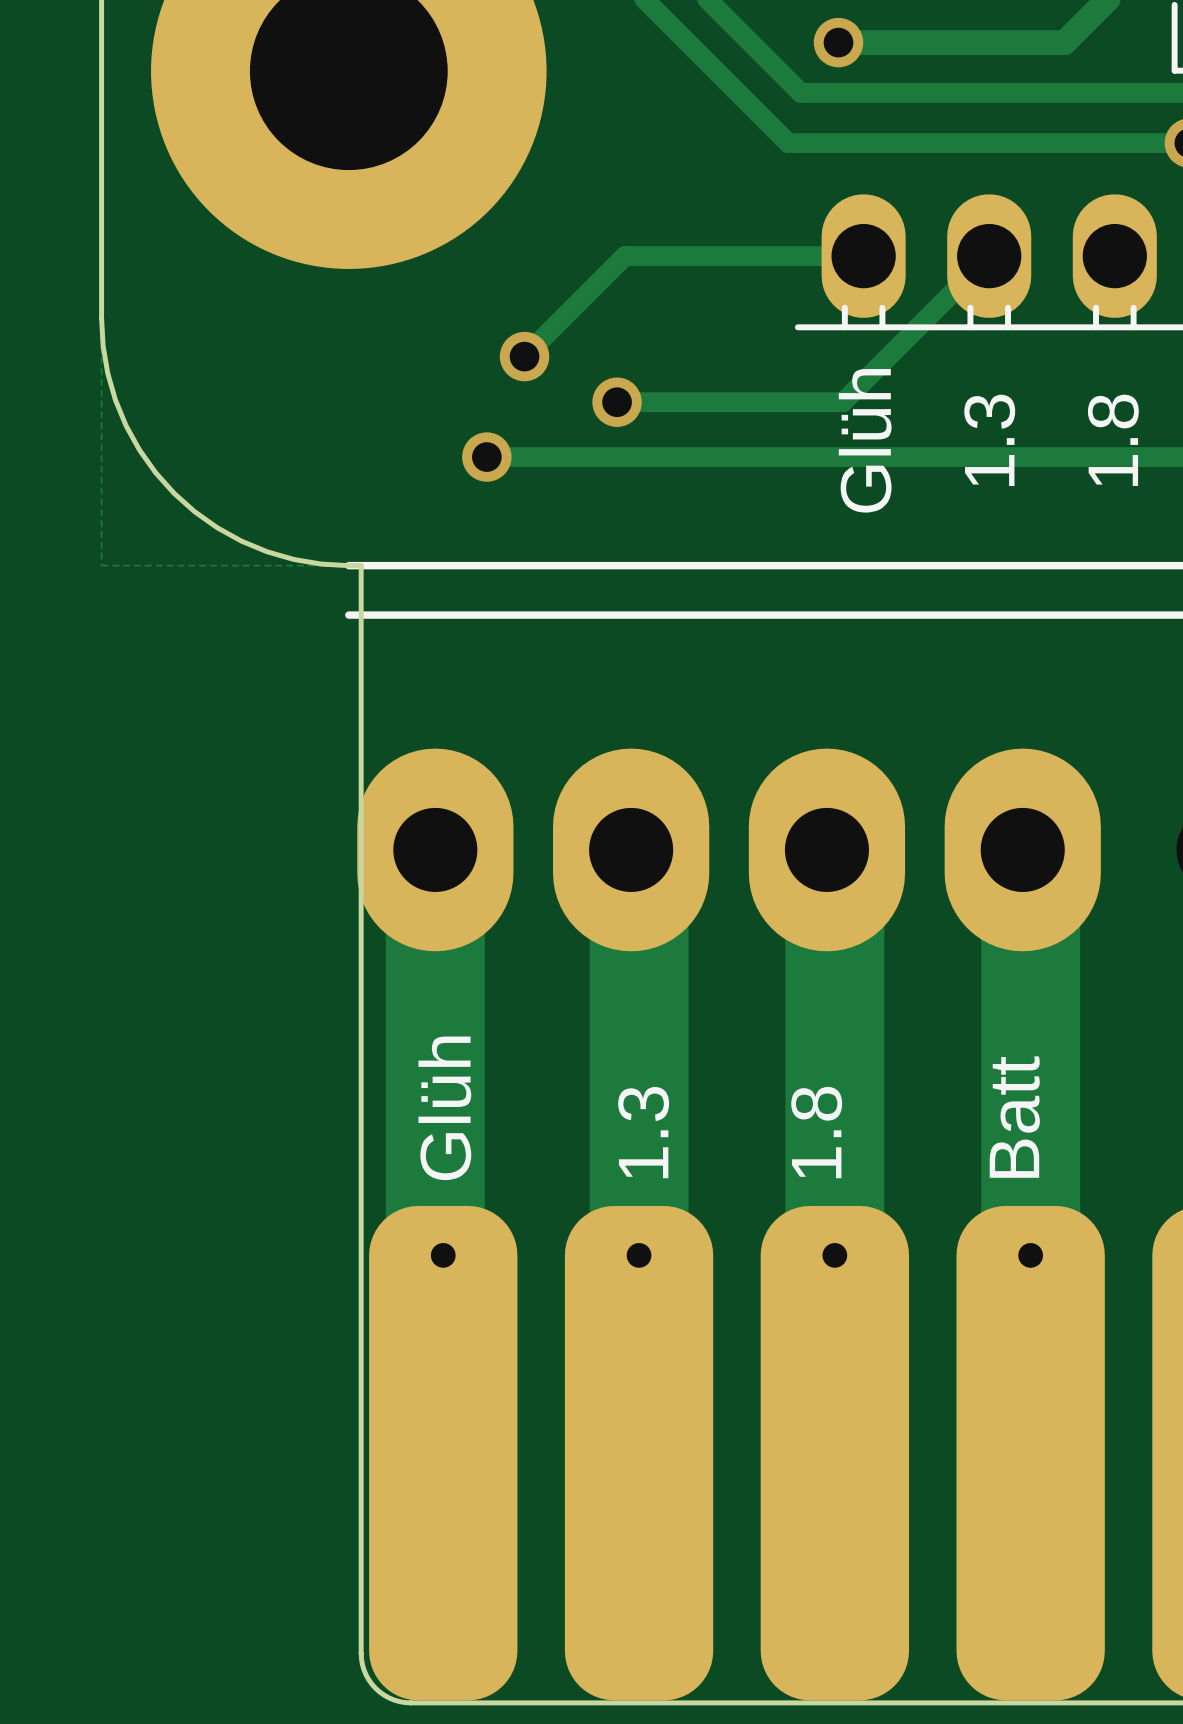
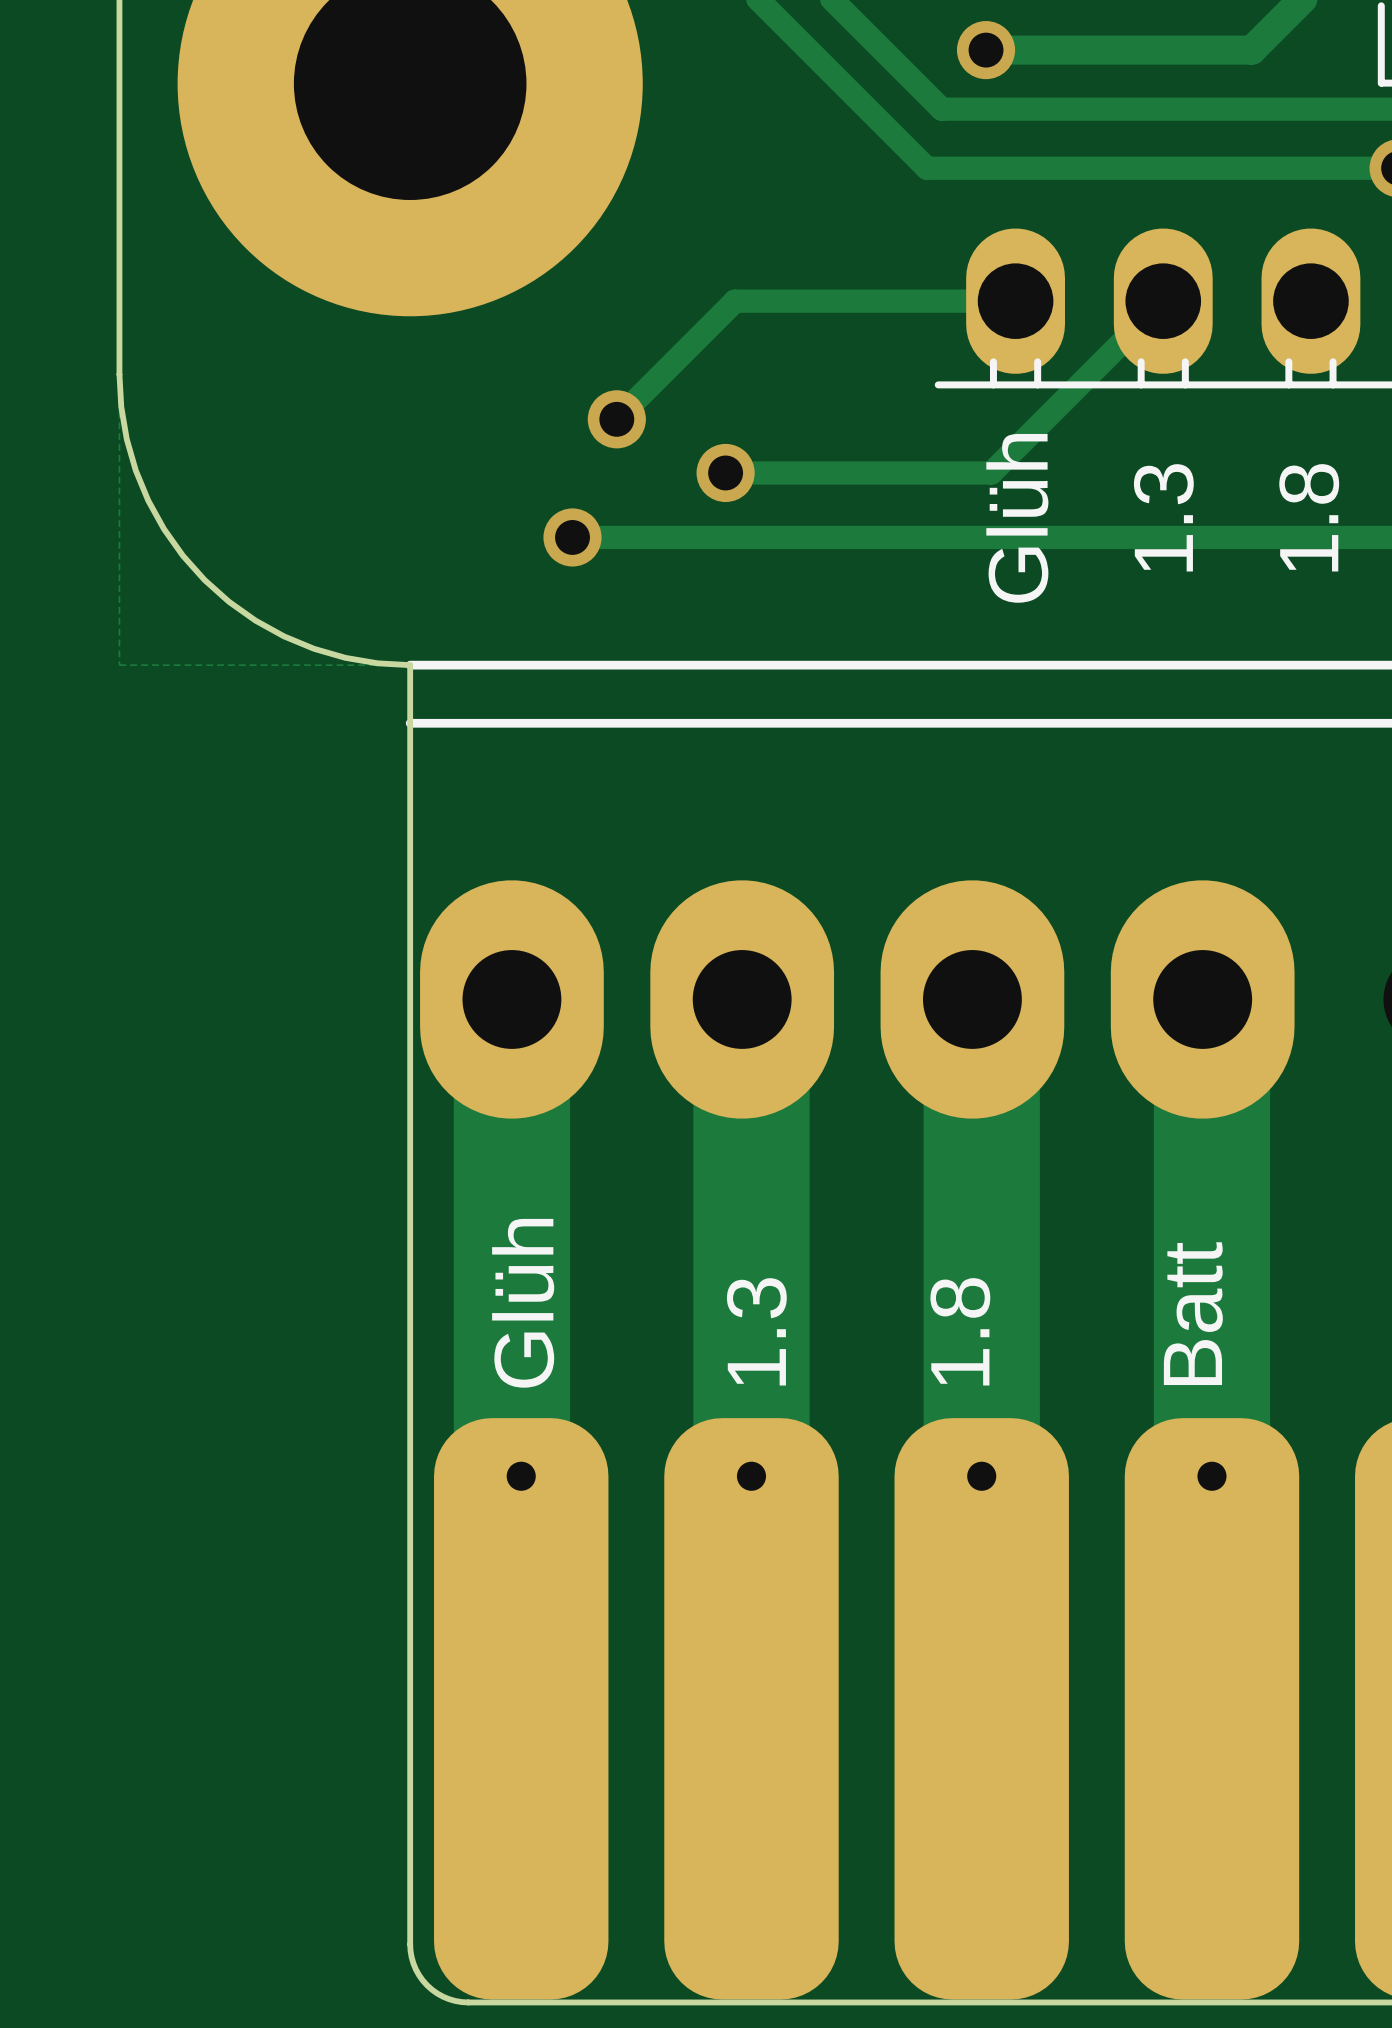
board edge: (348, 565) (361, 565) (361, 1653) (366, 1674) (375, 1688) (389, 1697) (410, 1702) -> (410, 665) (410, 1944) (415, 1969) (432, 1989) (455, 2001) (482, 2002)

